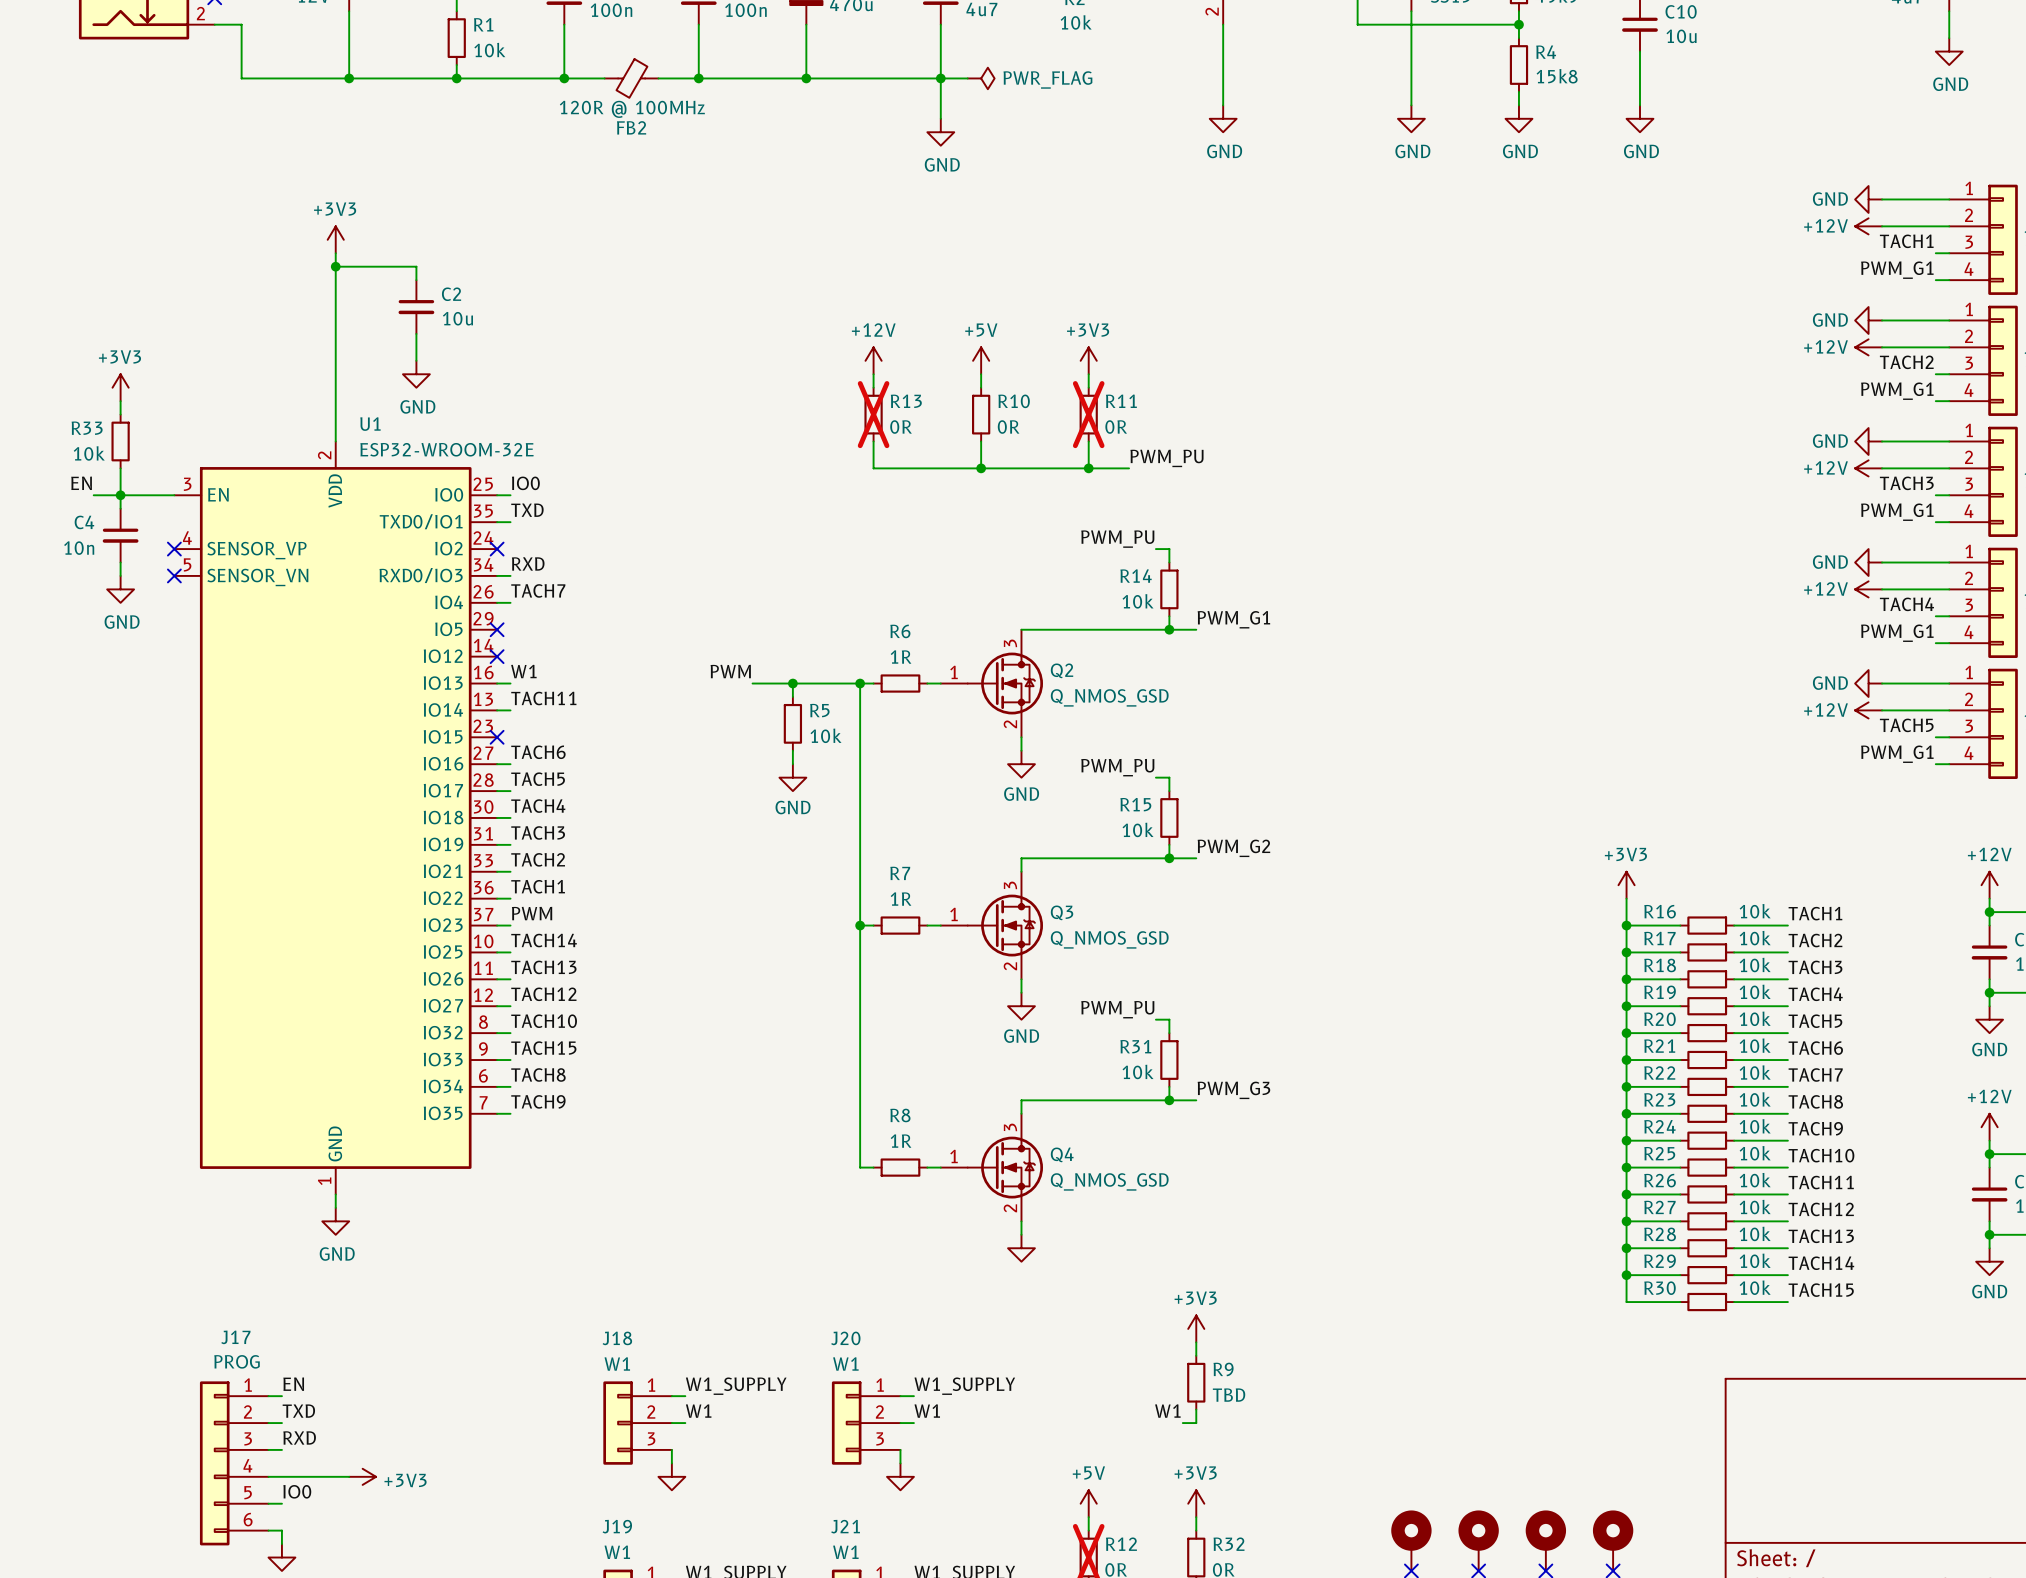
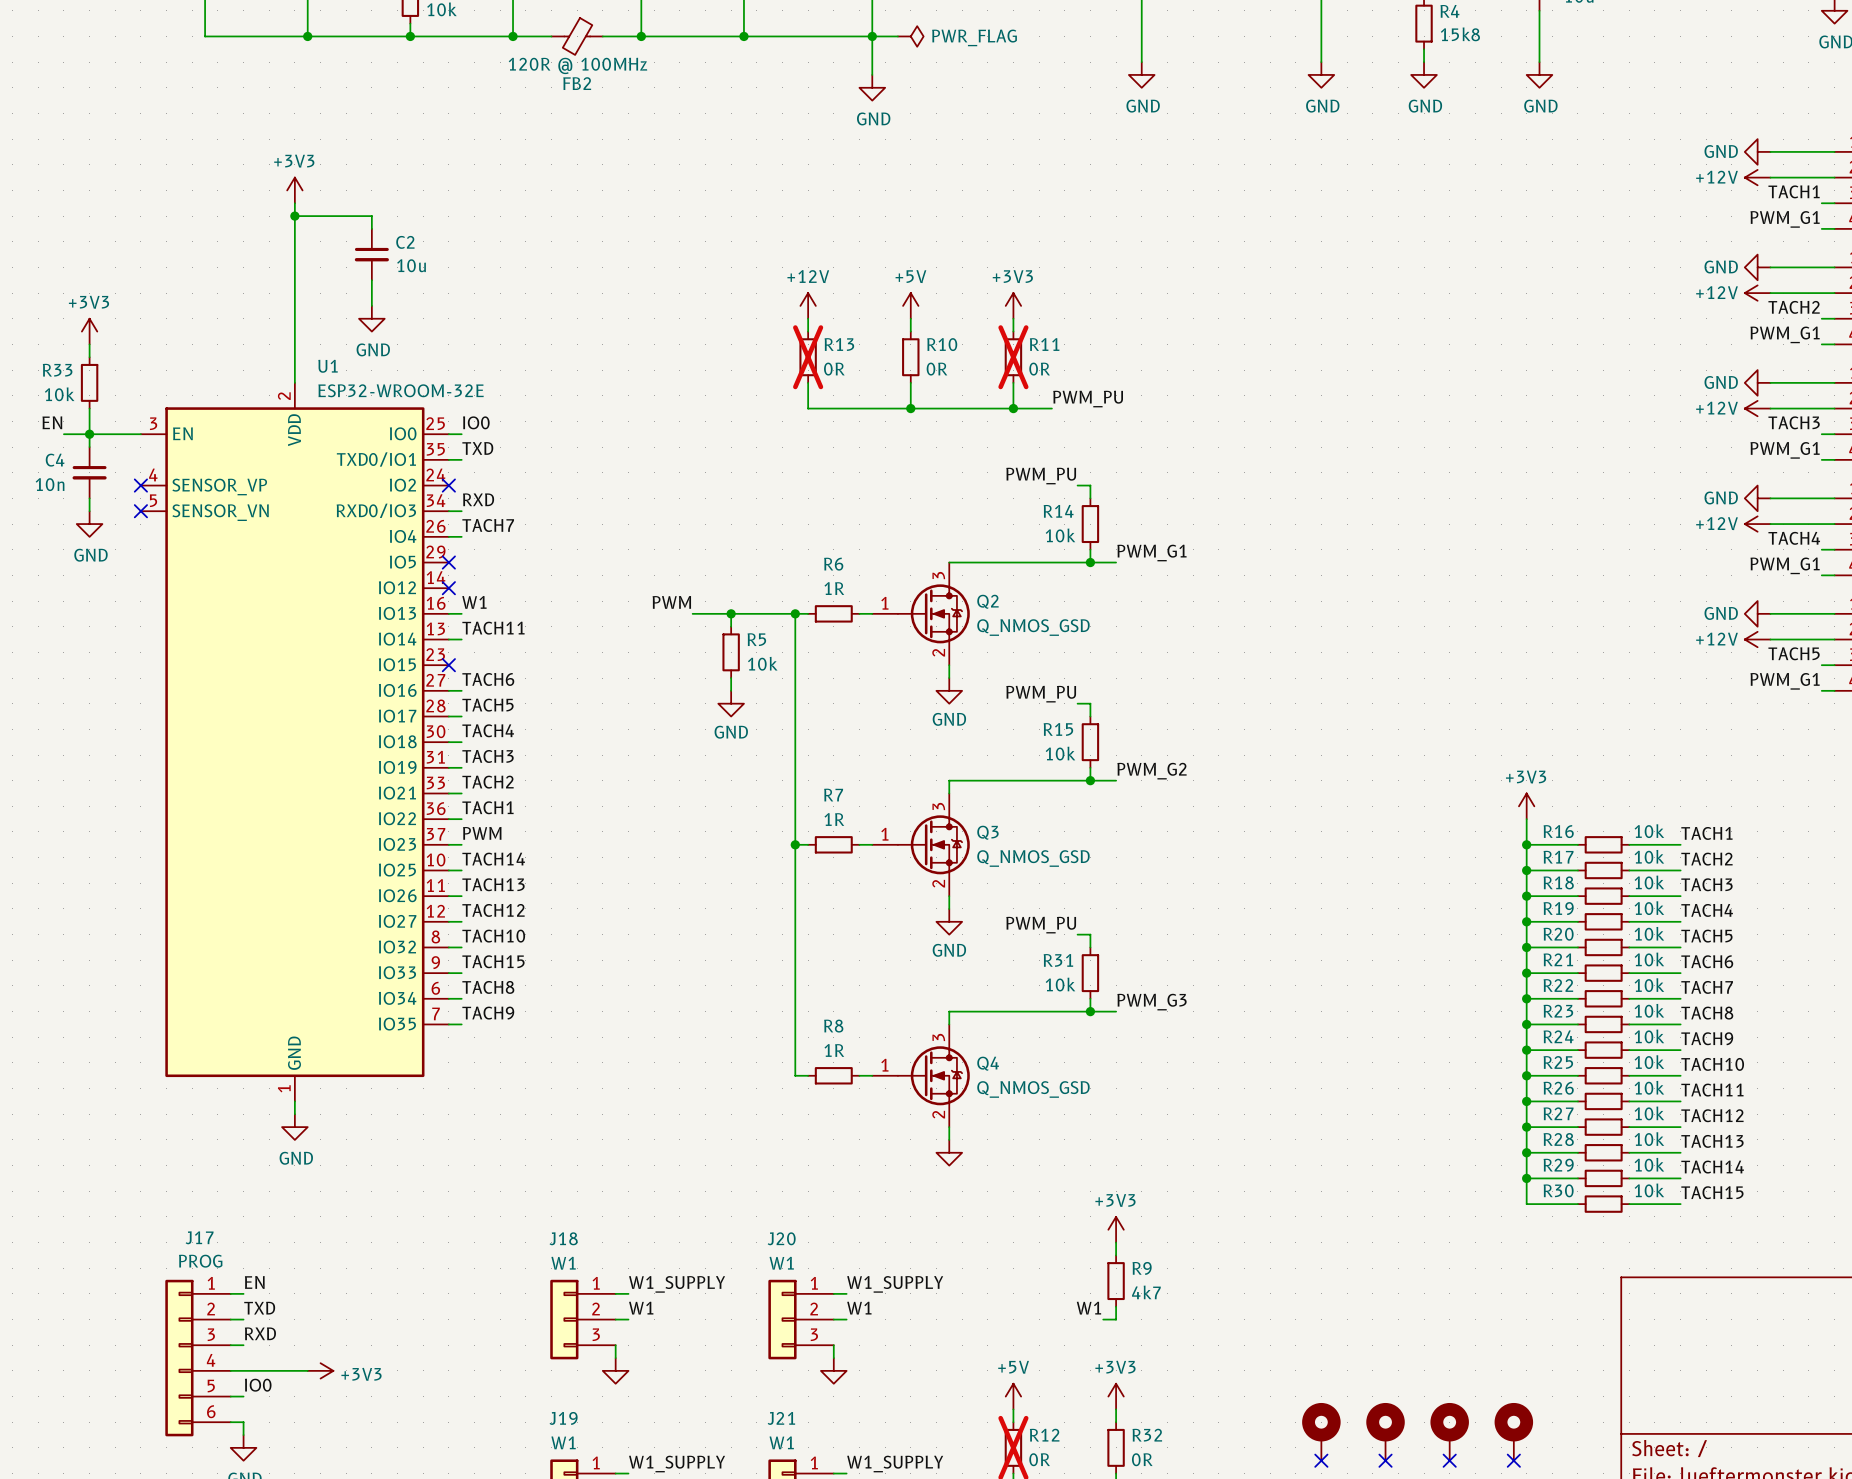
R9 value: TBD (1229, 1395) -> 4k7 (1146, 1292)

